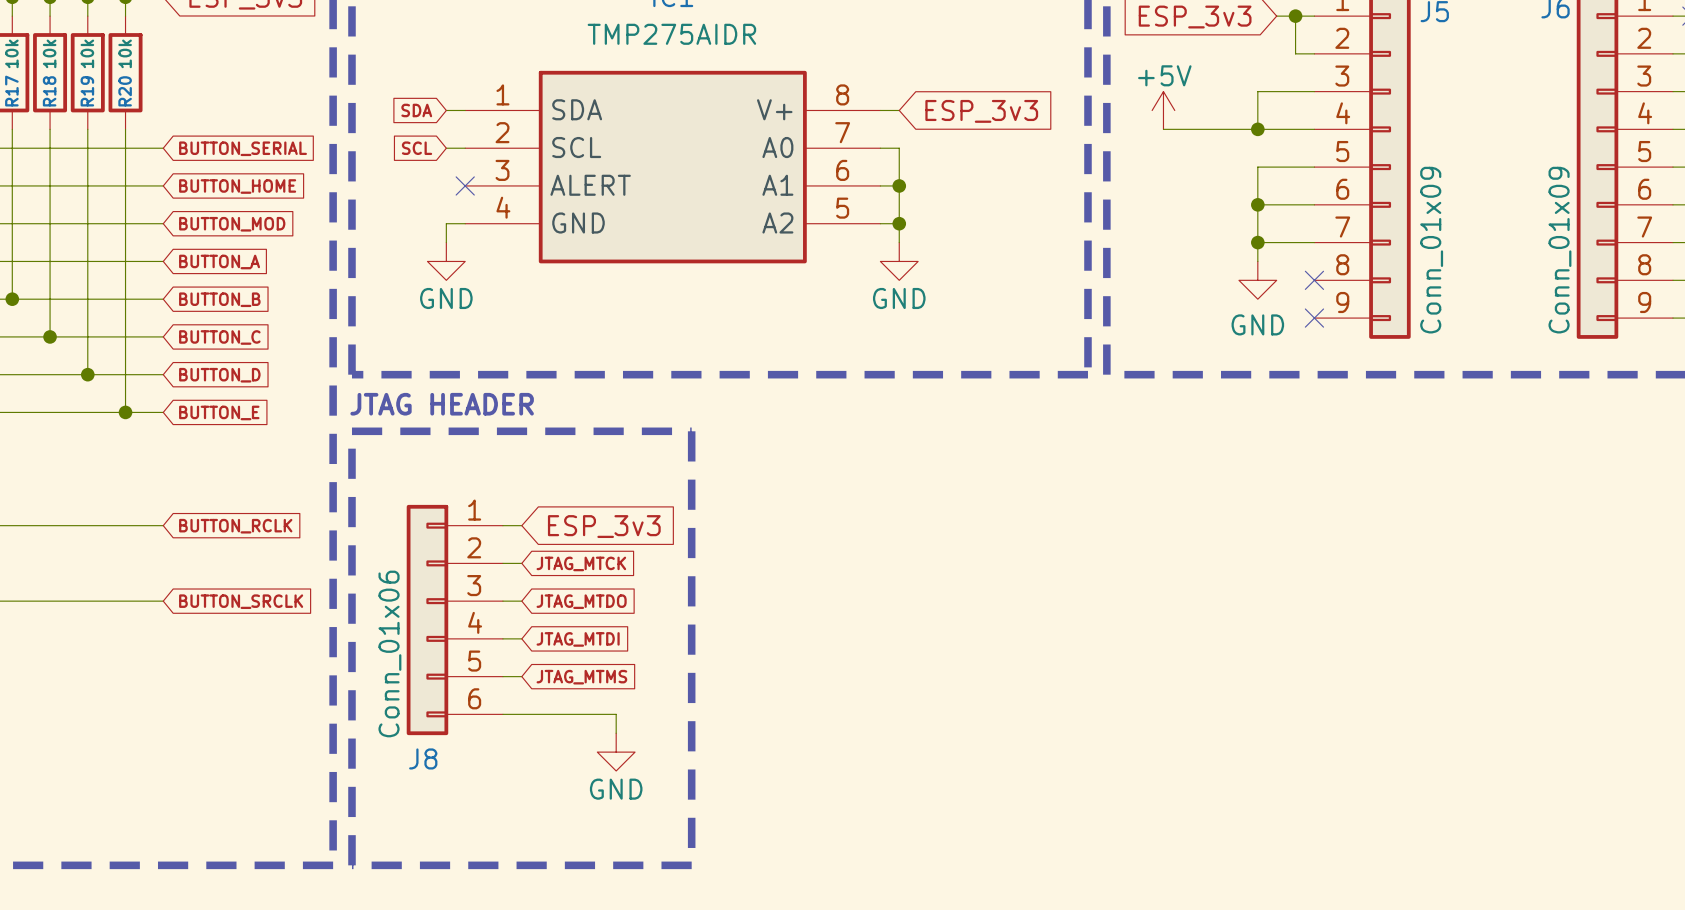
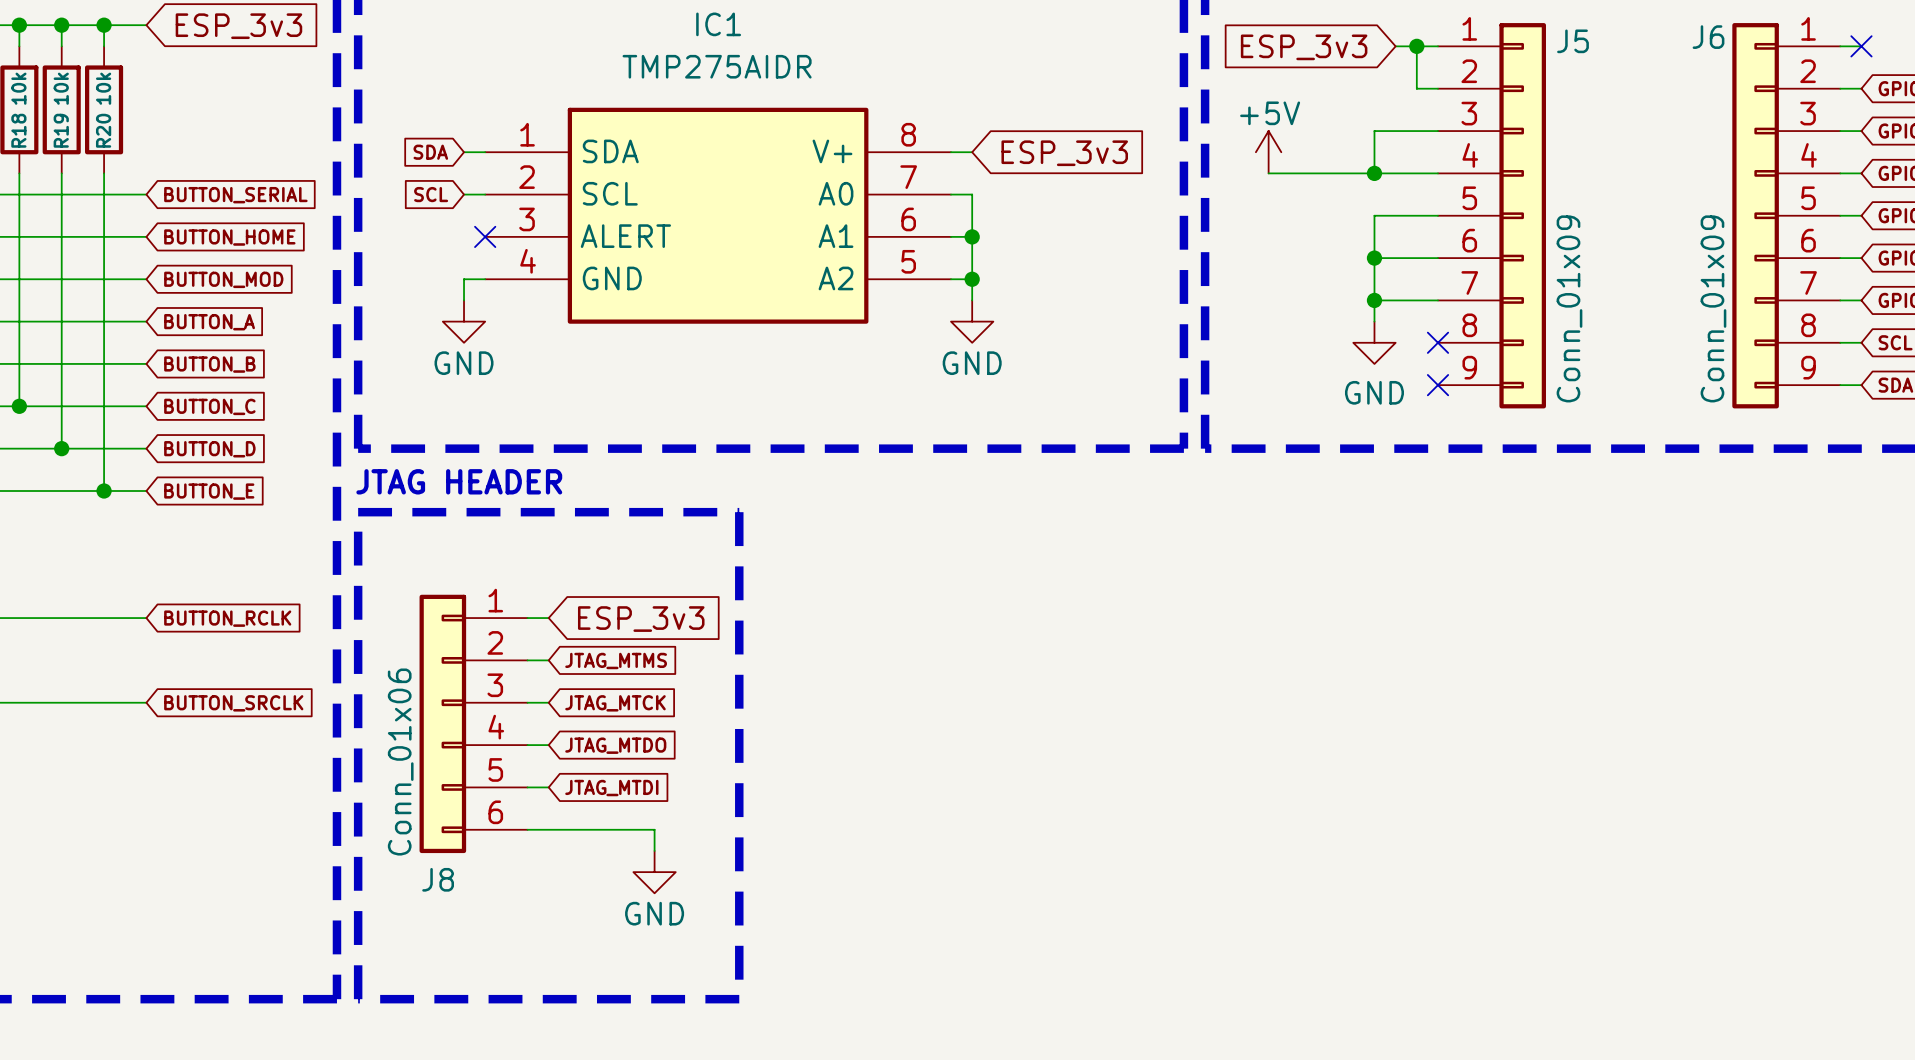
global label: JTAG_MTCK (581, 563) -> JTAG_MTMS (616, 660)
global label: JTAG_MTDO (581, 601) -> JTAG_MTCK (615, 703)
global label: JTAG_MTDI (578, 639) -> JTAG_MTDO (615, 745)
global label: JTAG_MTMS (581, 677) -> JTAG_MTDI (611, 788)

